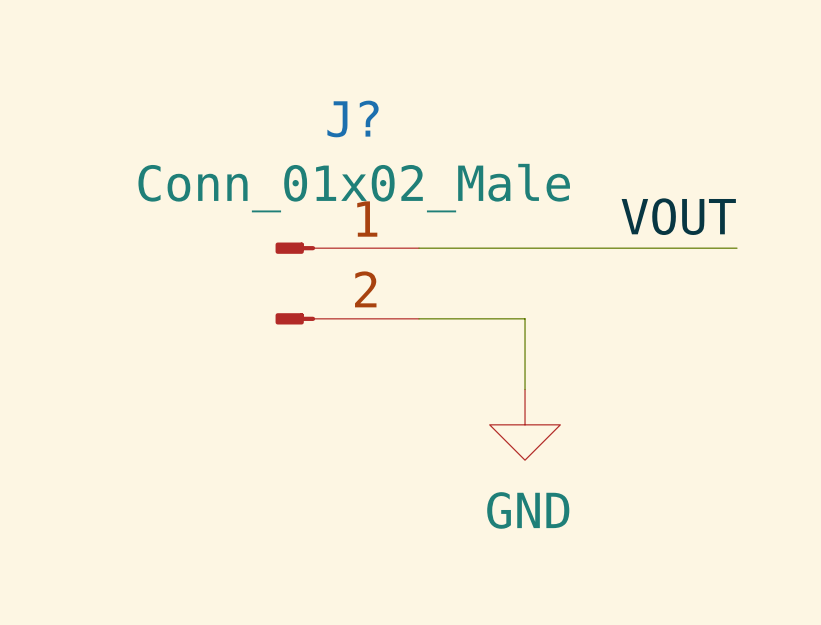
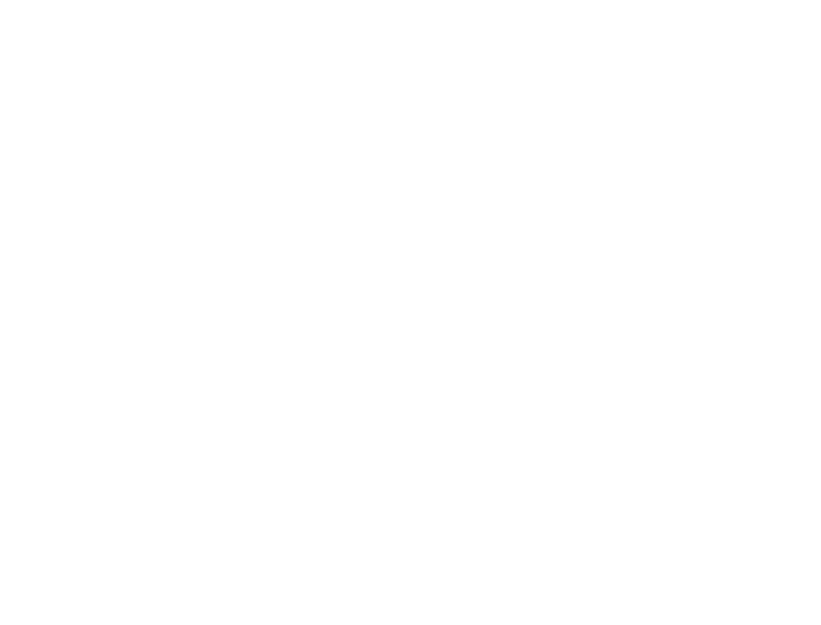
label: VOUT (678, 216) -> none
wire: (419, 248) (737, 248) -> none
J?: Conn_01x02_Male (347, 283) -> none
wire: (419, 318) (525, 318) (525, 389) -> none
power symbol: GND (525, 424) -> none

